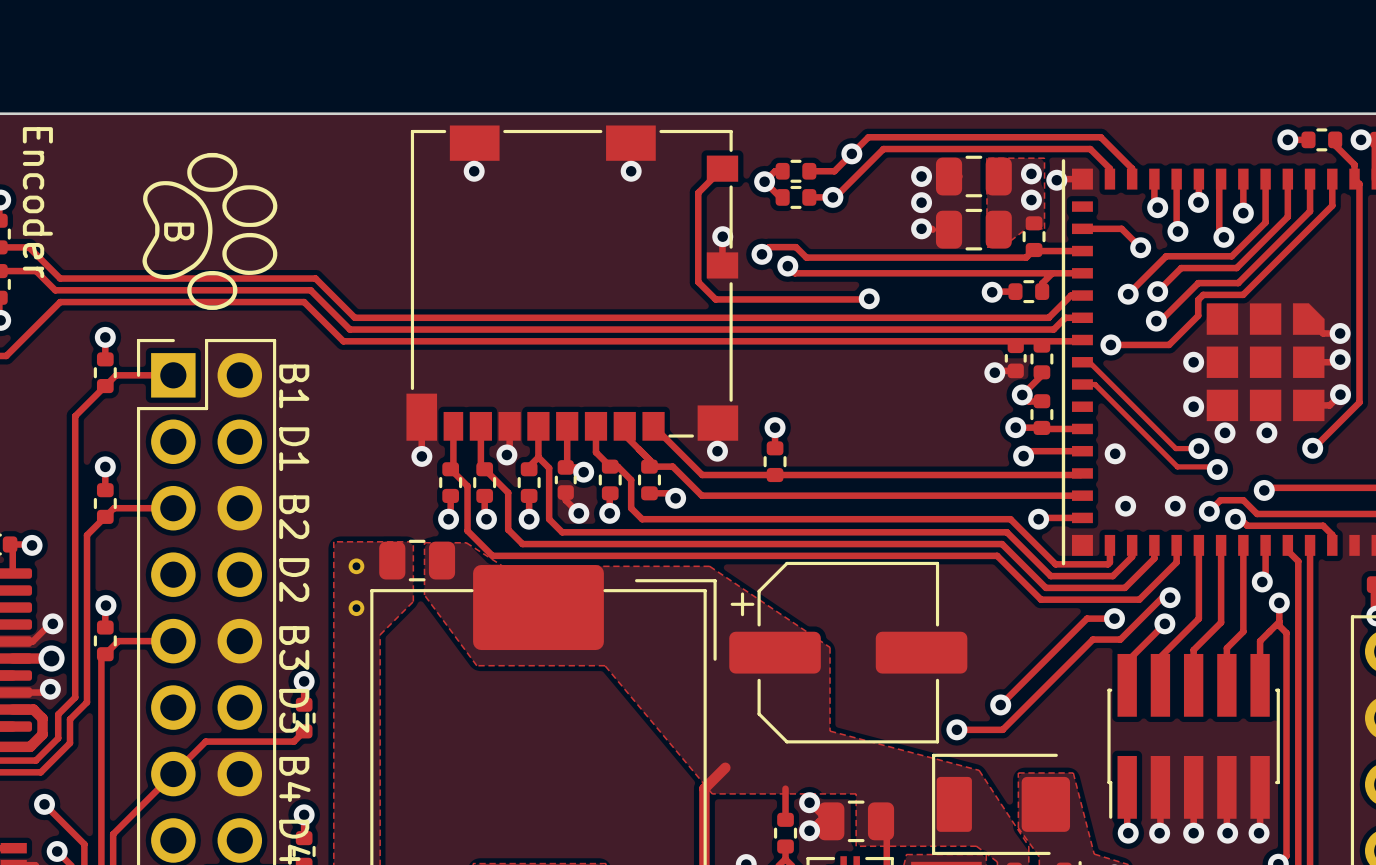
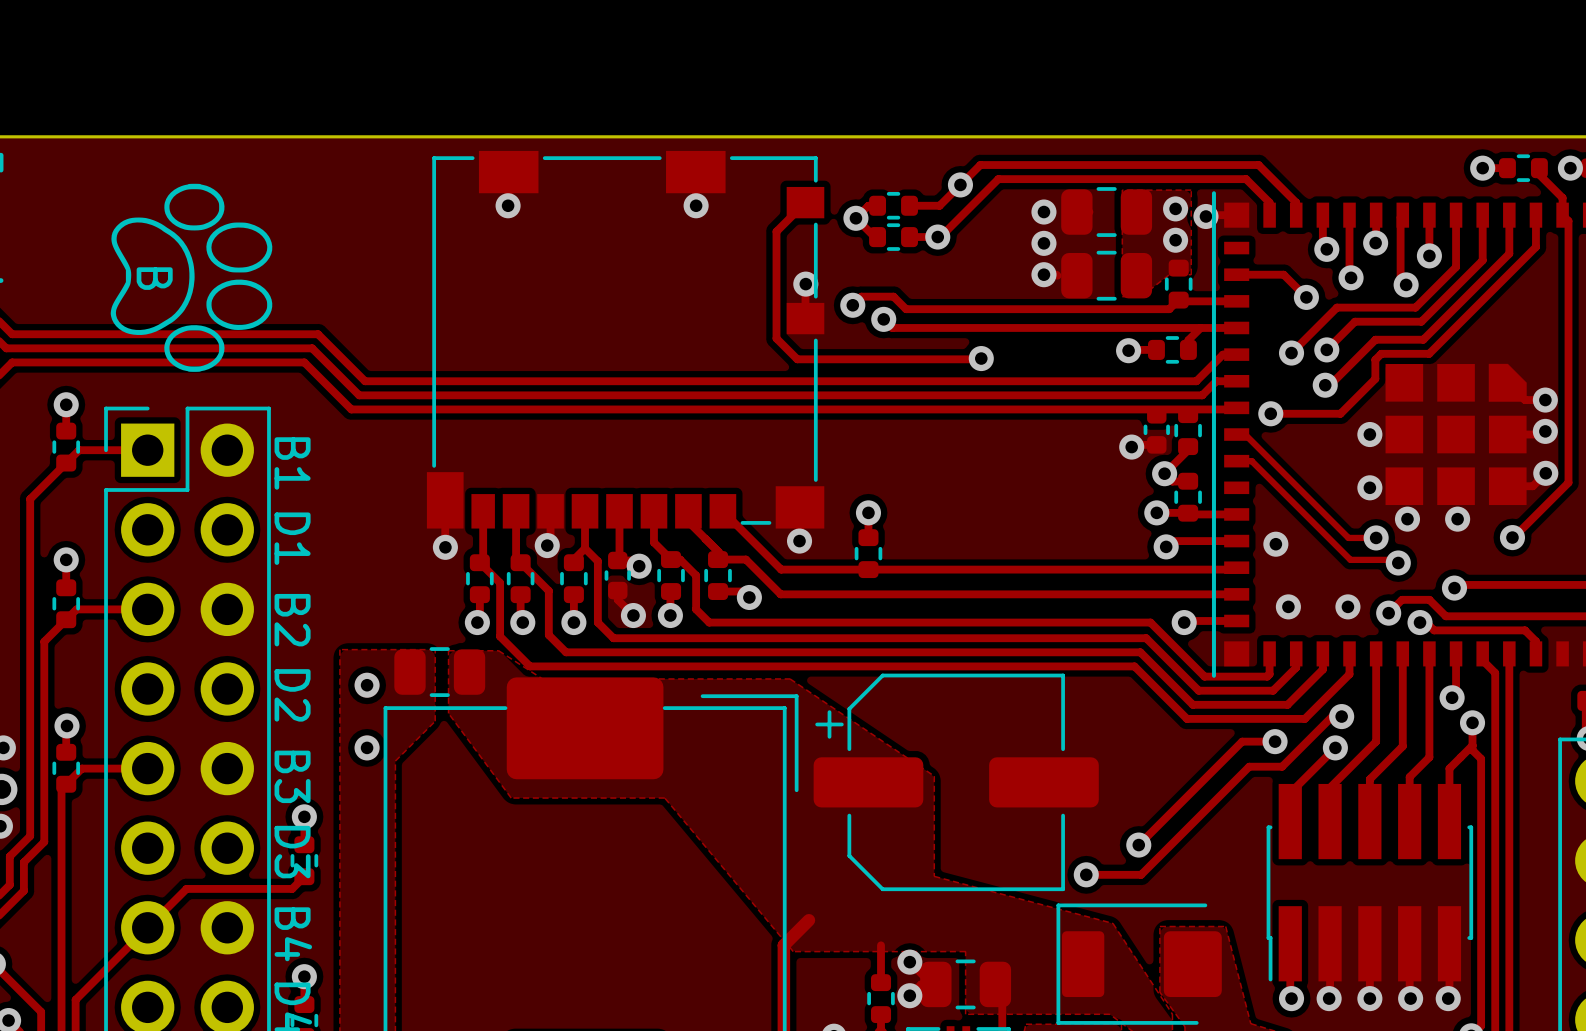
part: (356, 566) -> none
via: none -> (367, 685)
part: (356, 608) -> none
via: none -> (367, 747)

